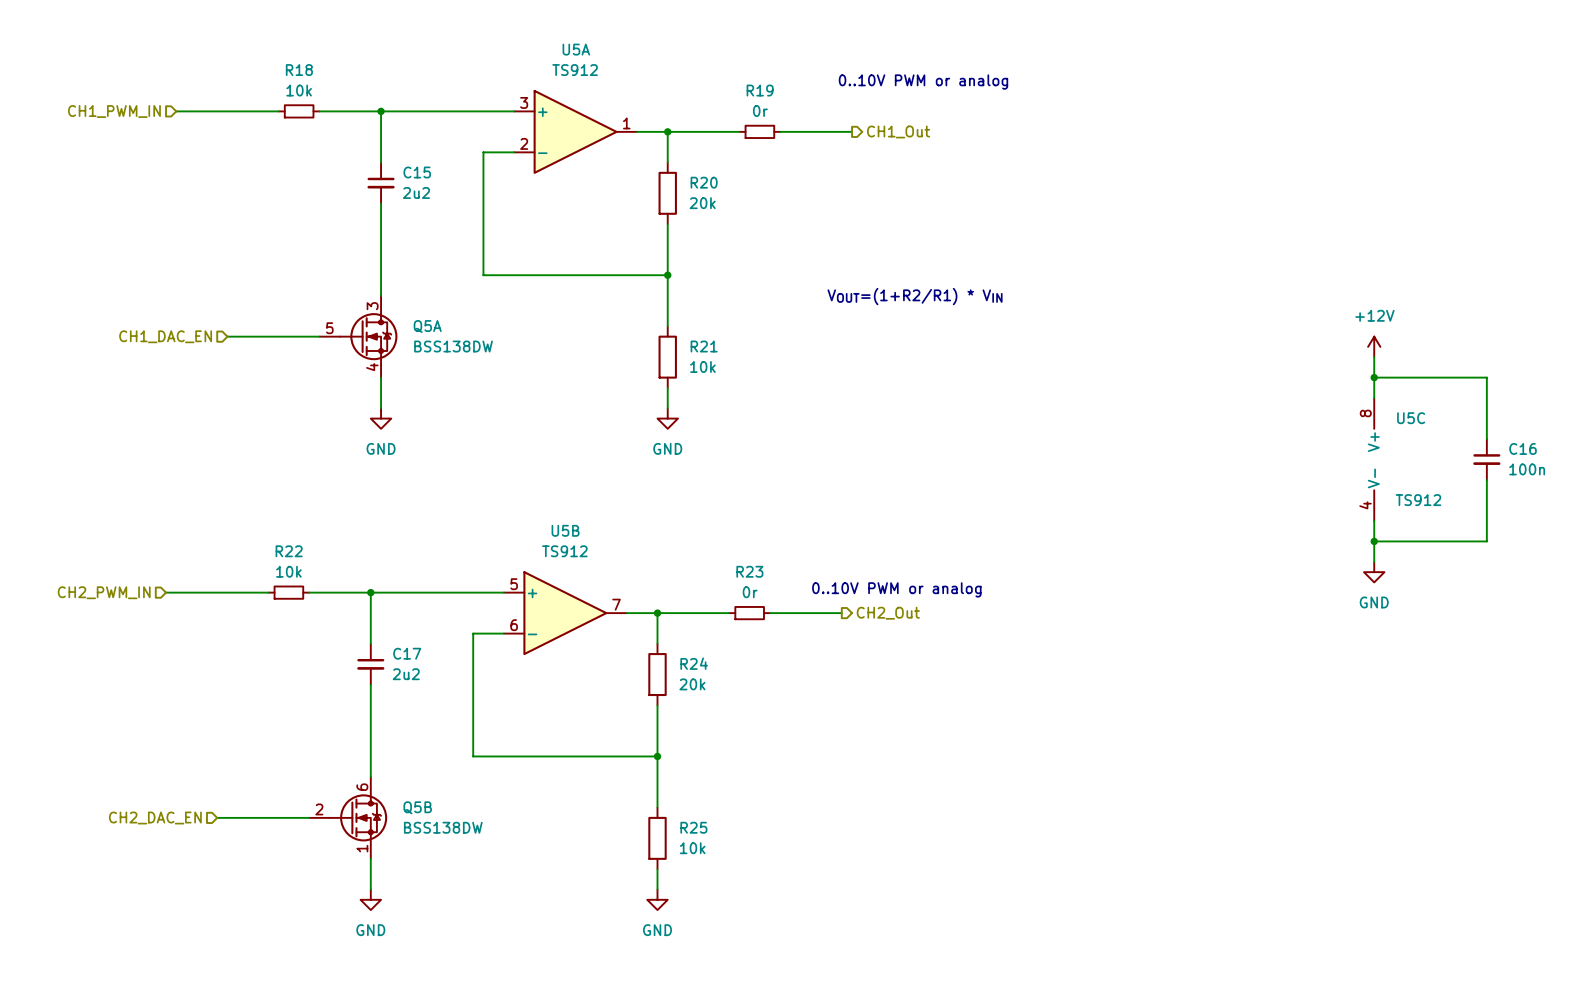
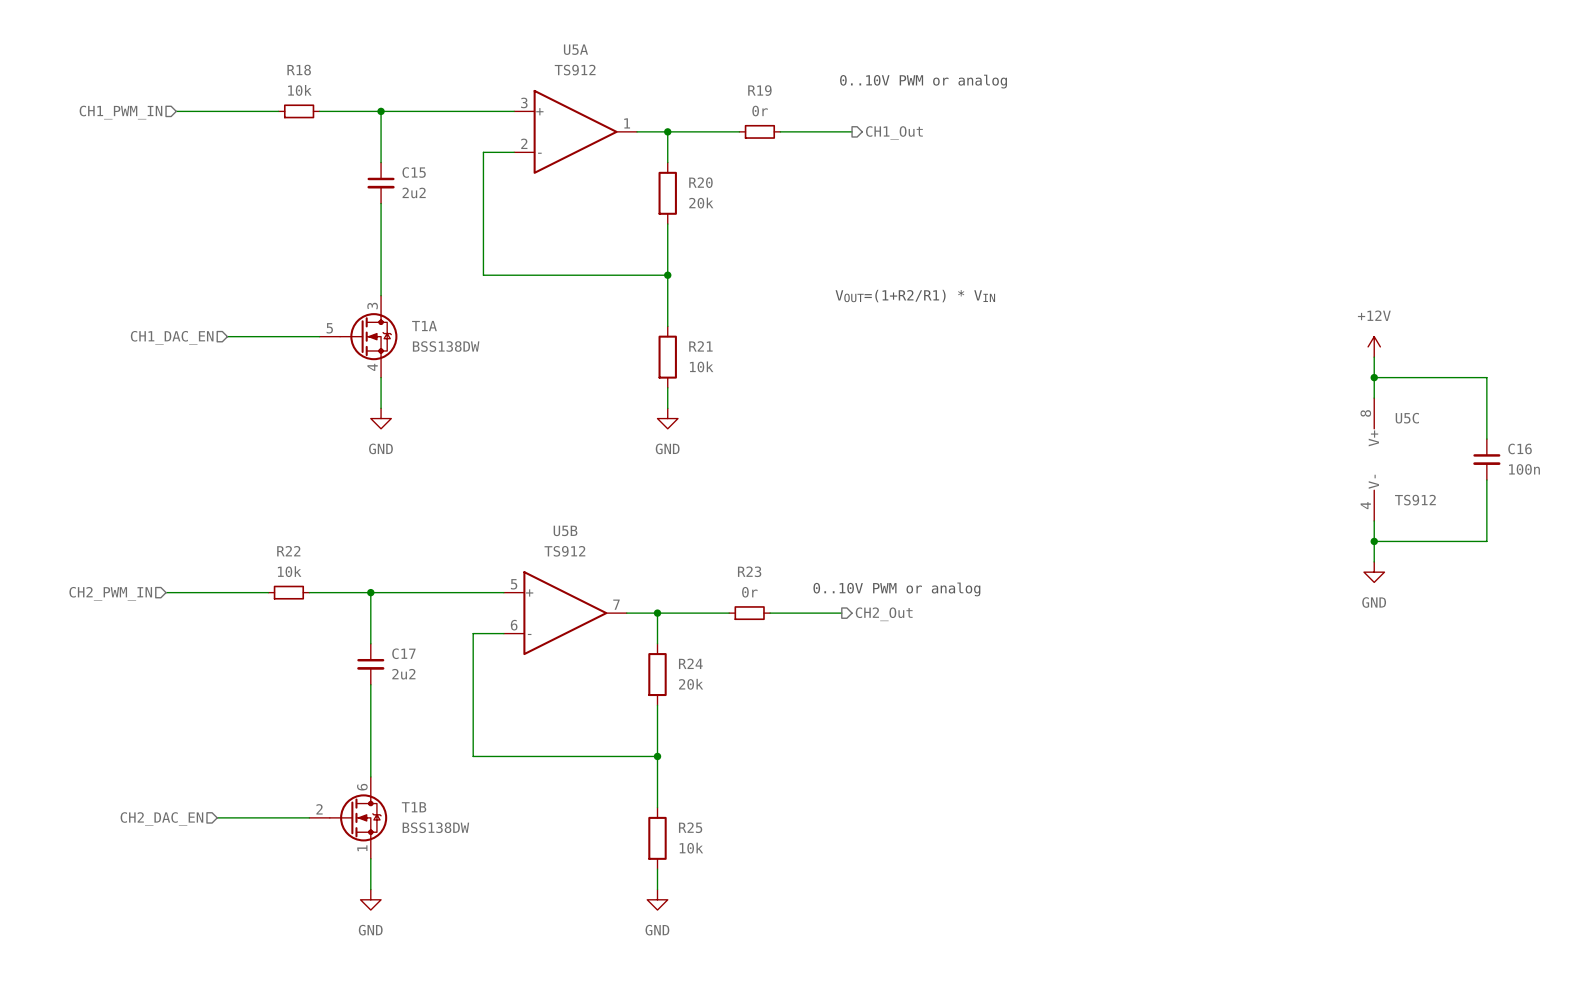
Q5A name: Q5A (427, 326) -> T1A (424, 326)
Q5B name: Q5B (417, 807) -> T1B (414, 807)

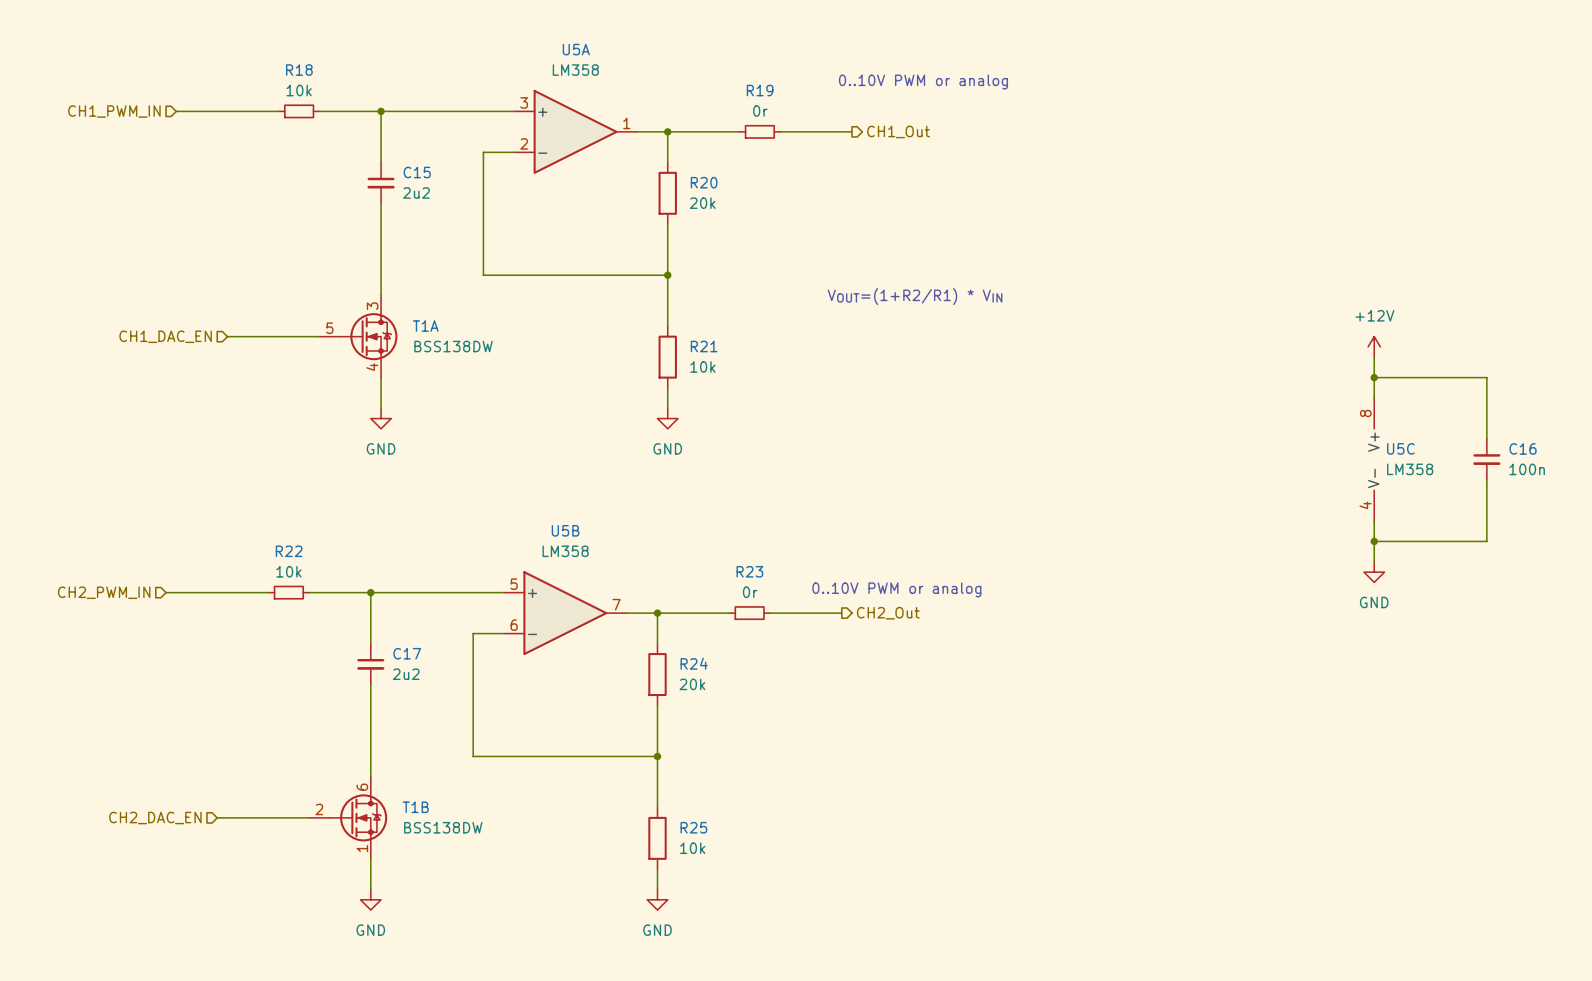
U5A value: TS912 (575, 70) -> LM358 (575, 70)
U5C name position: U5C (1407, 418) -> U5C (1400, 448)
U5C value: TS912 (1415, 500) -> LM358 (1410, 469)
U5B value: TS912 (564, 551) -> LM358 (565, 551)

